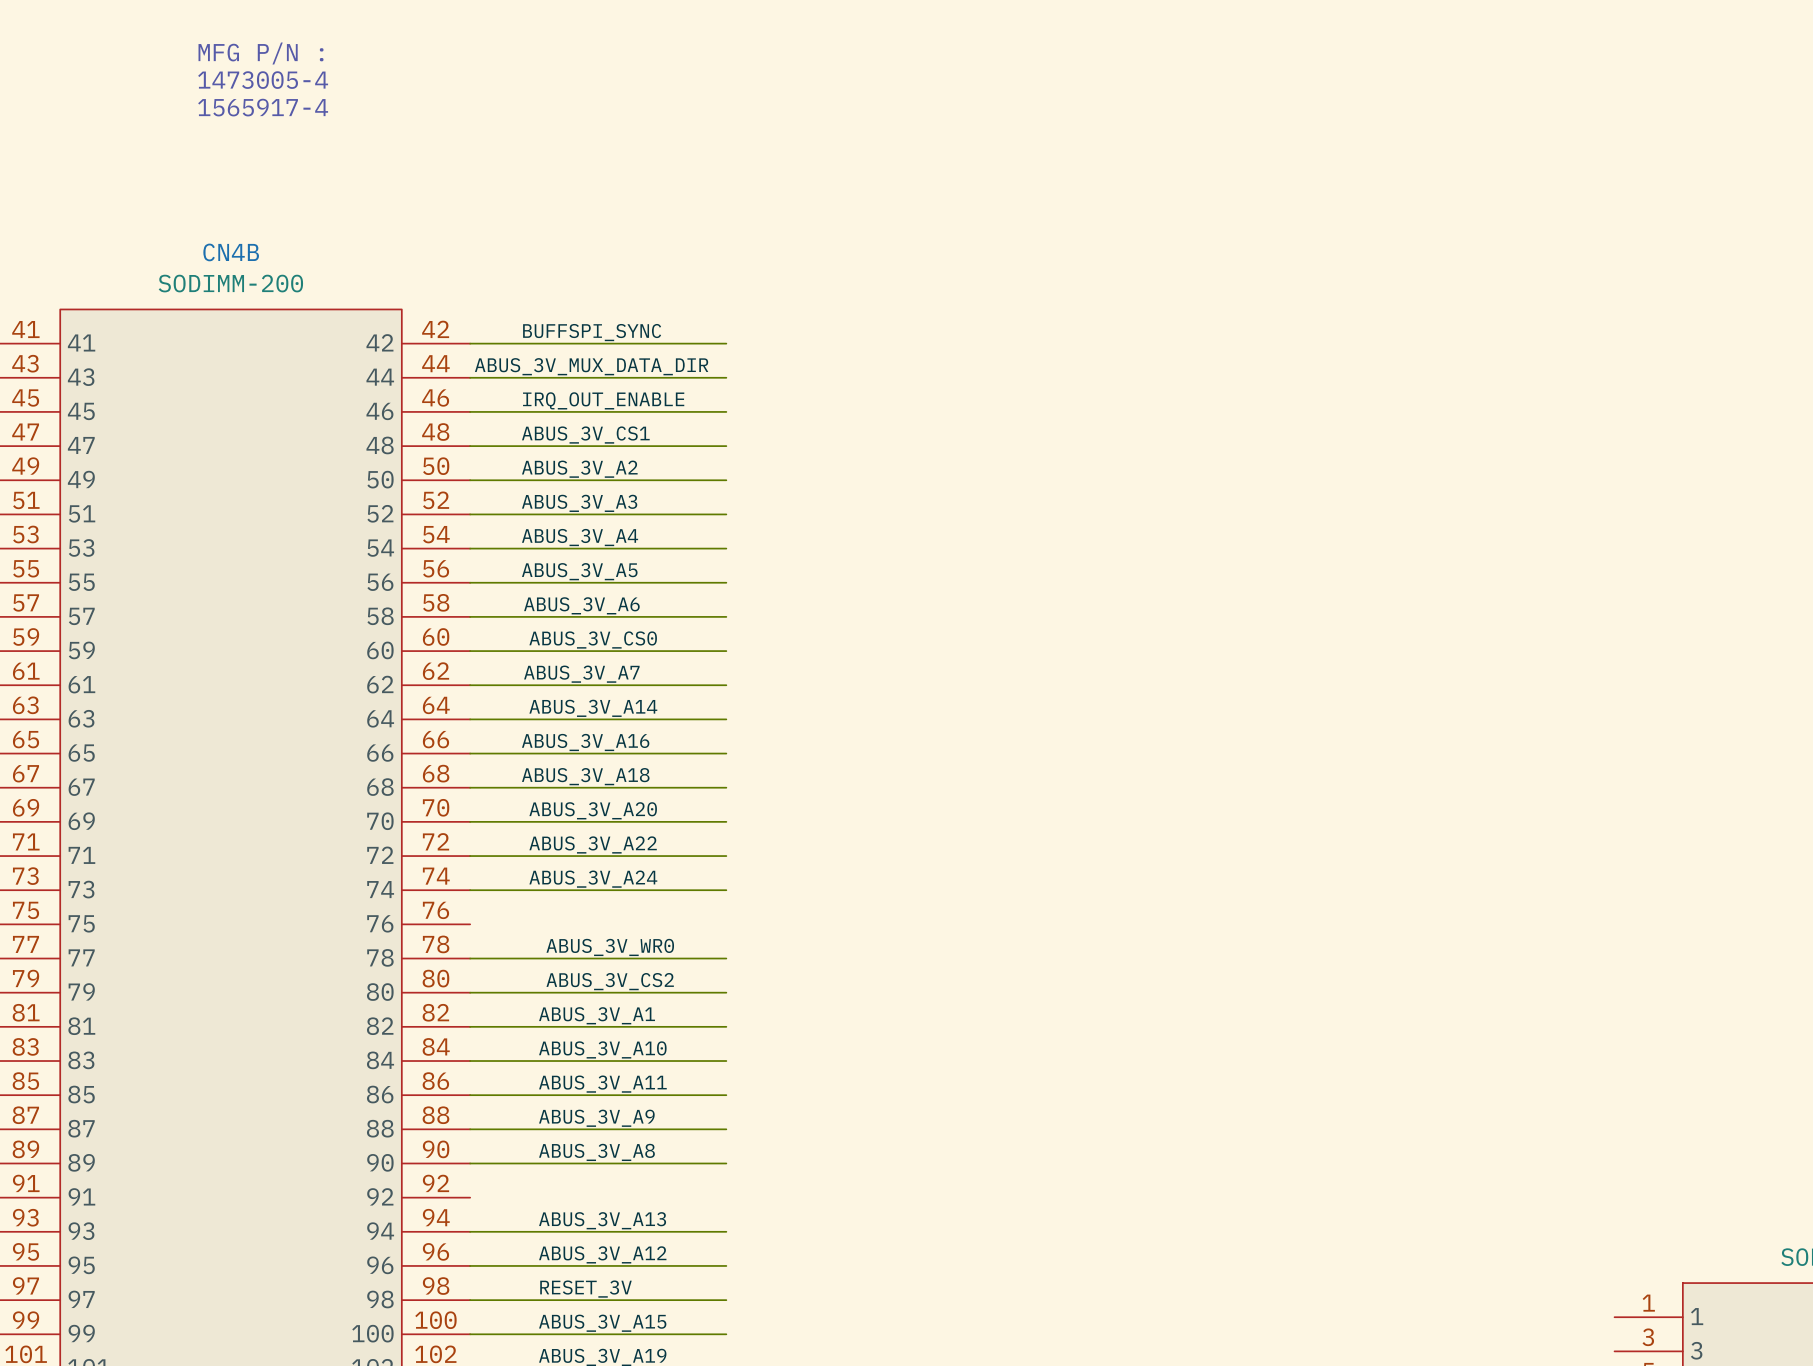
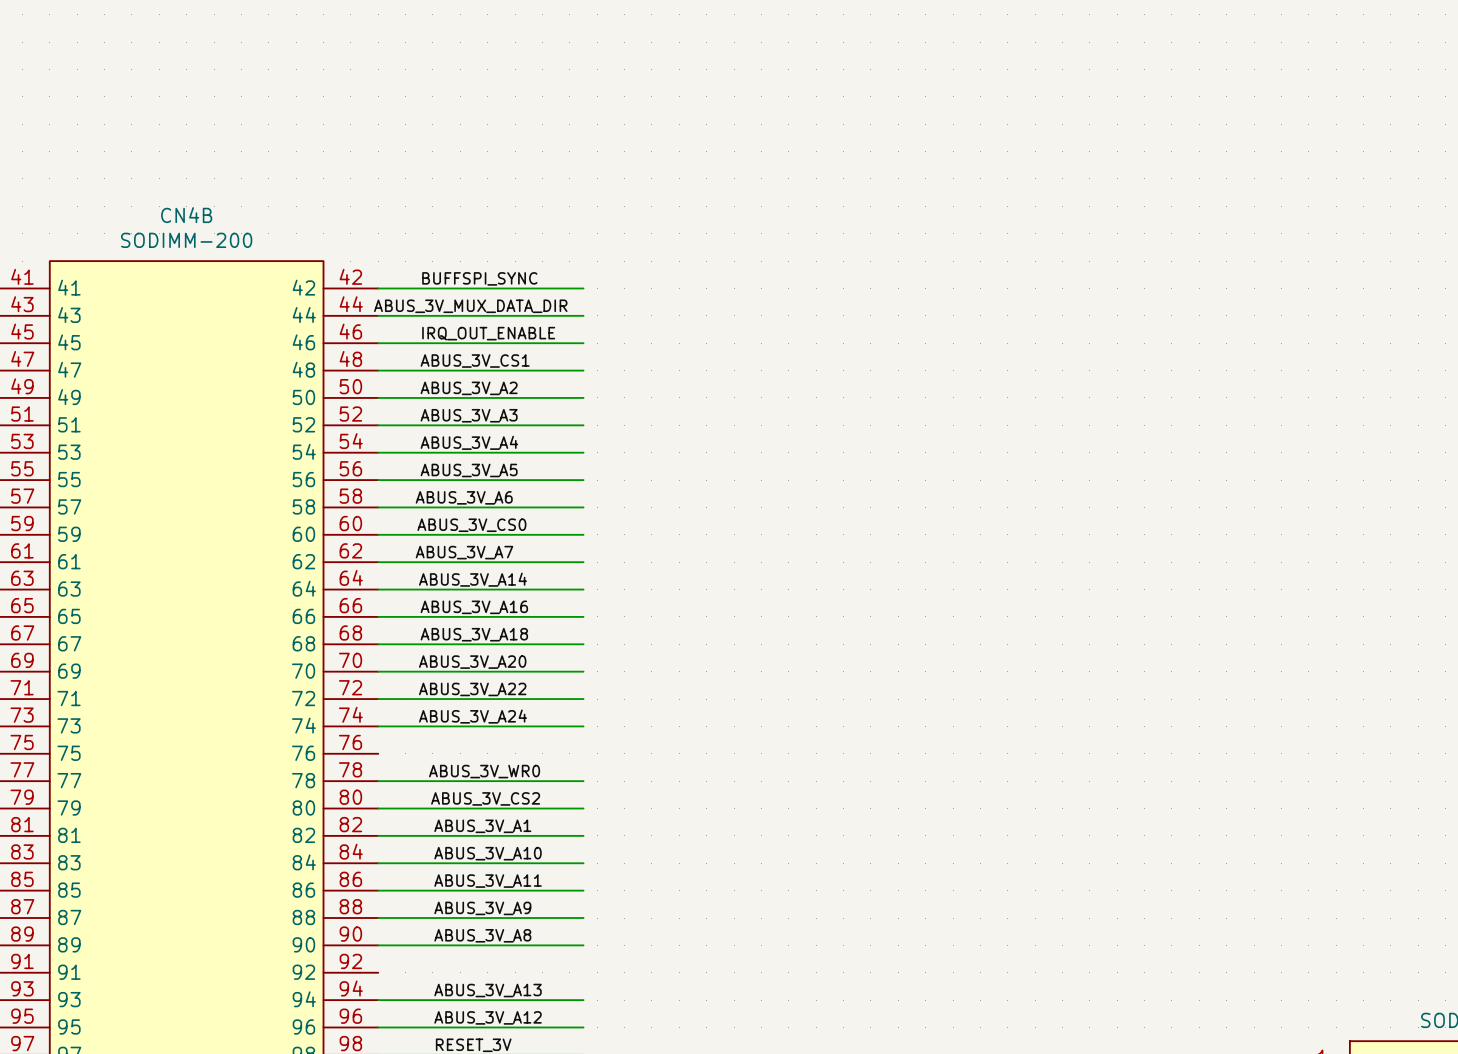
text: MFG P/N : (260, 53) -> none
text: 1473005-4 (263, 80) -> none
text: 1565917-4 (263, 107) -> none

